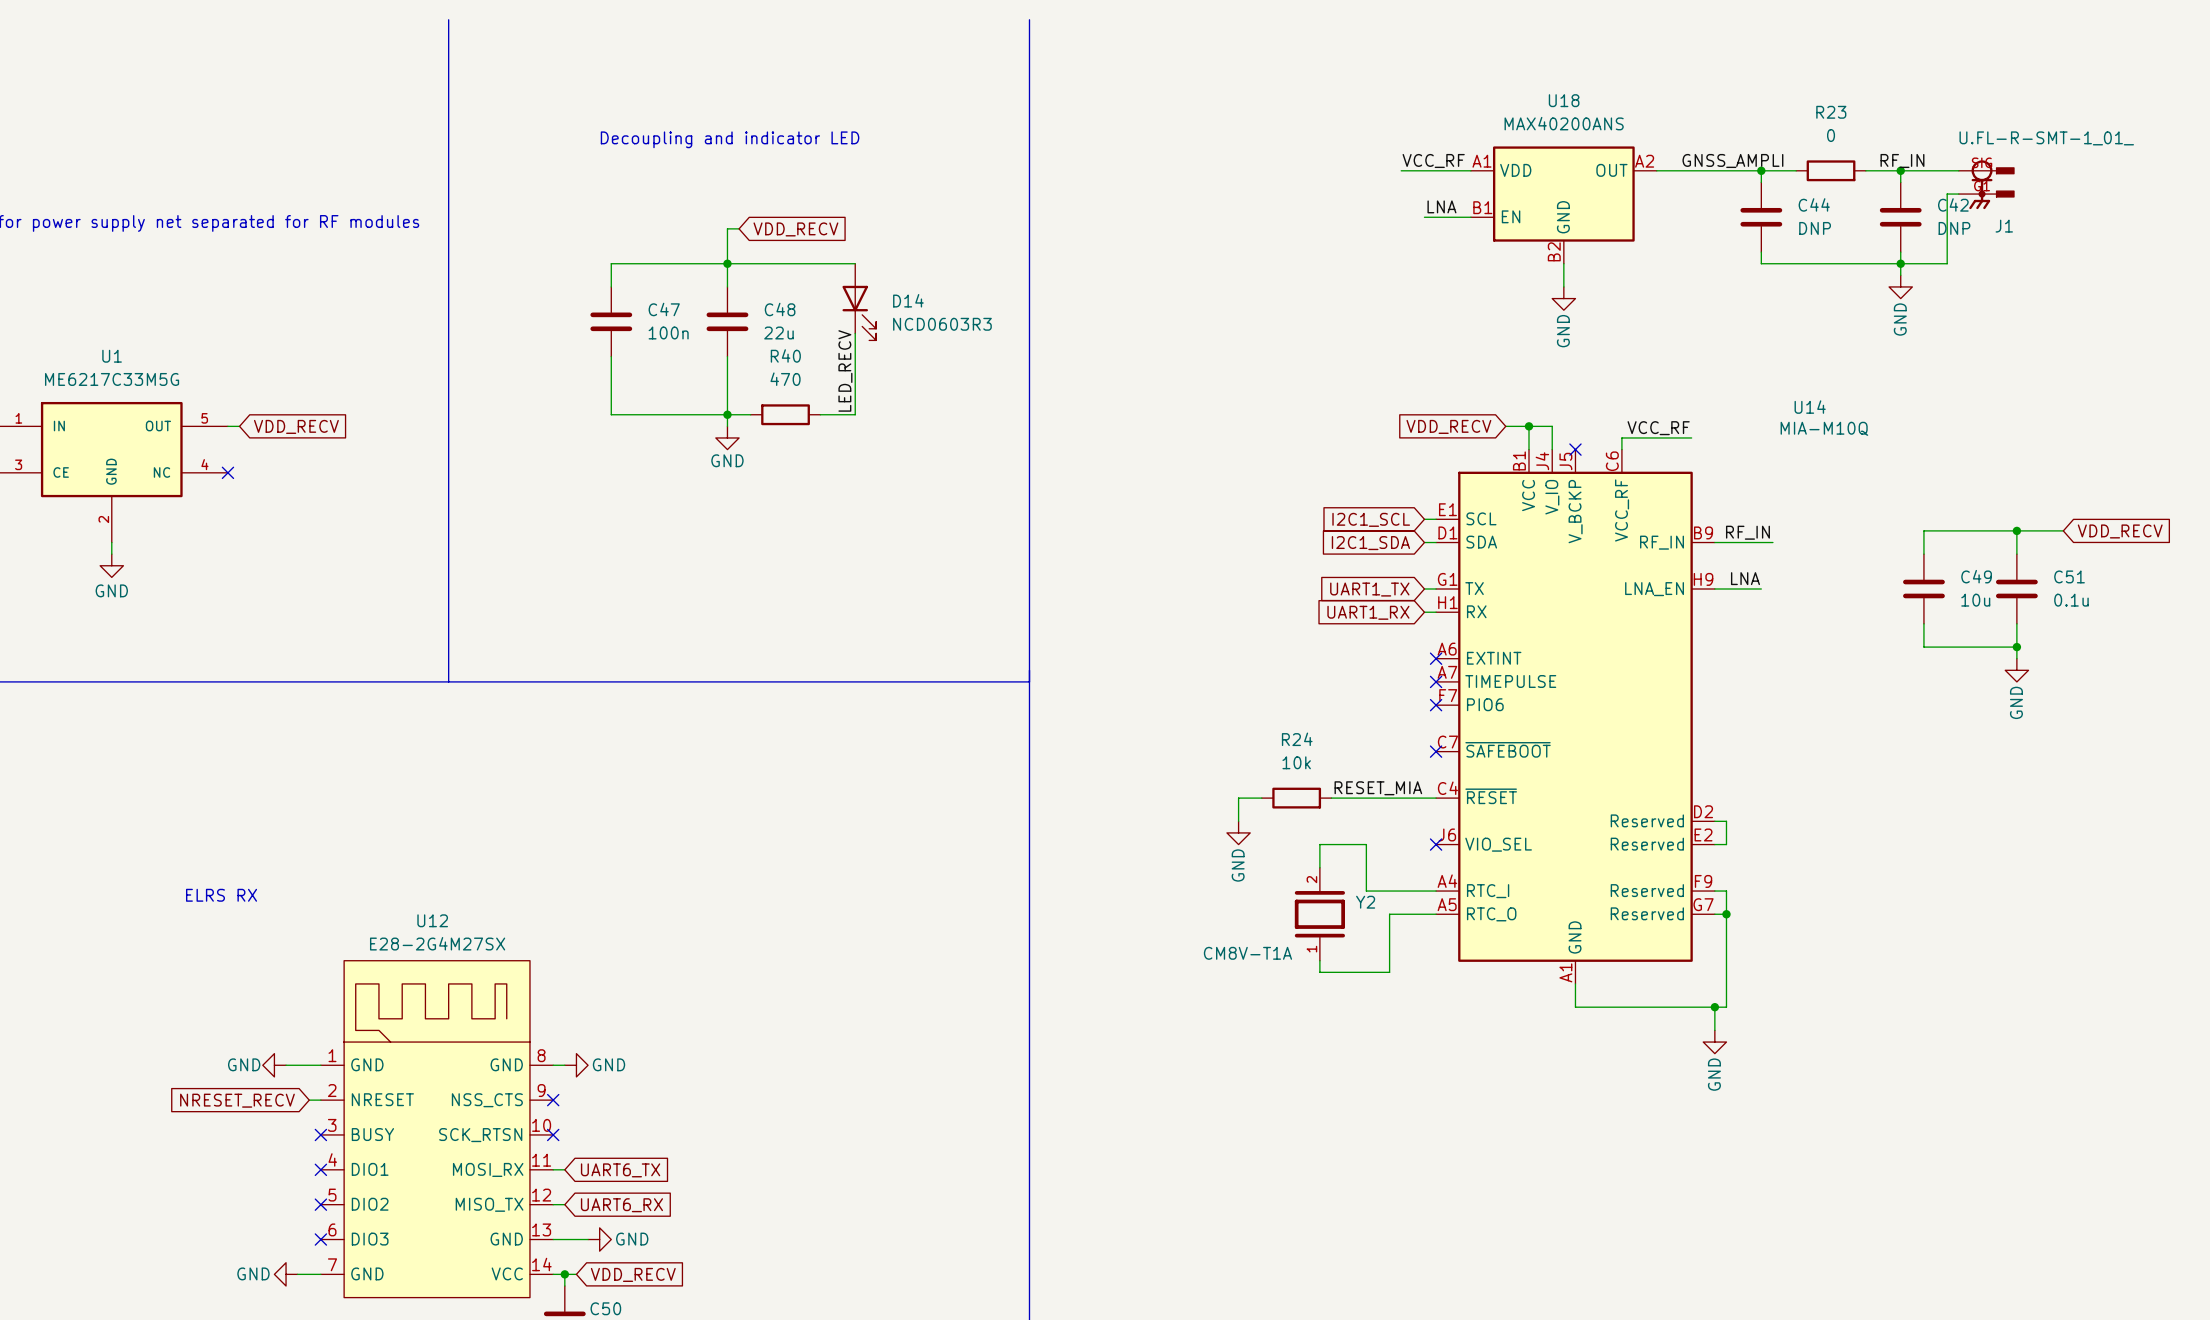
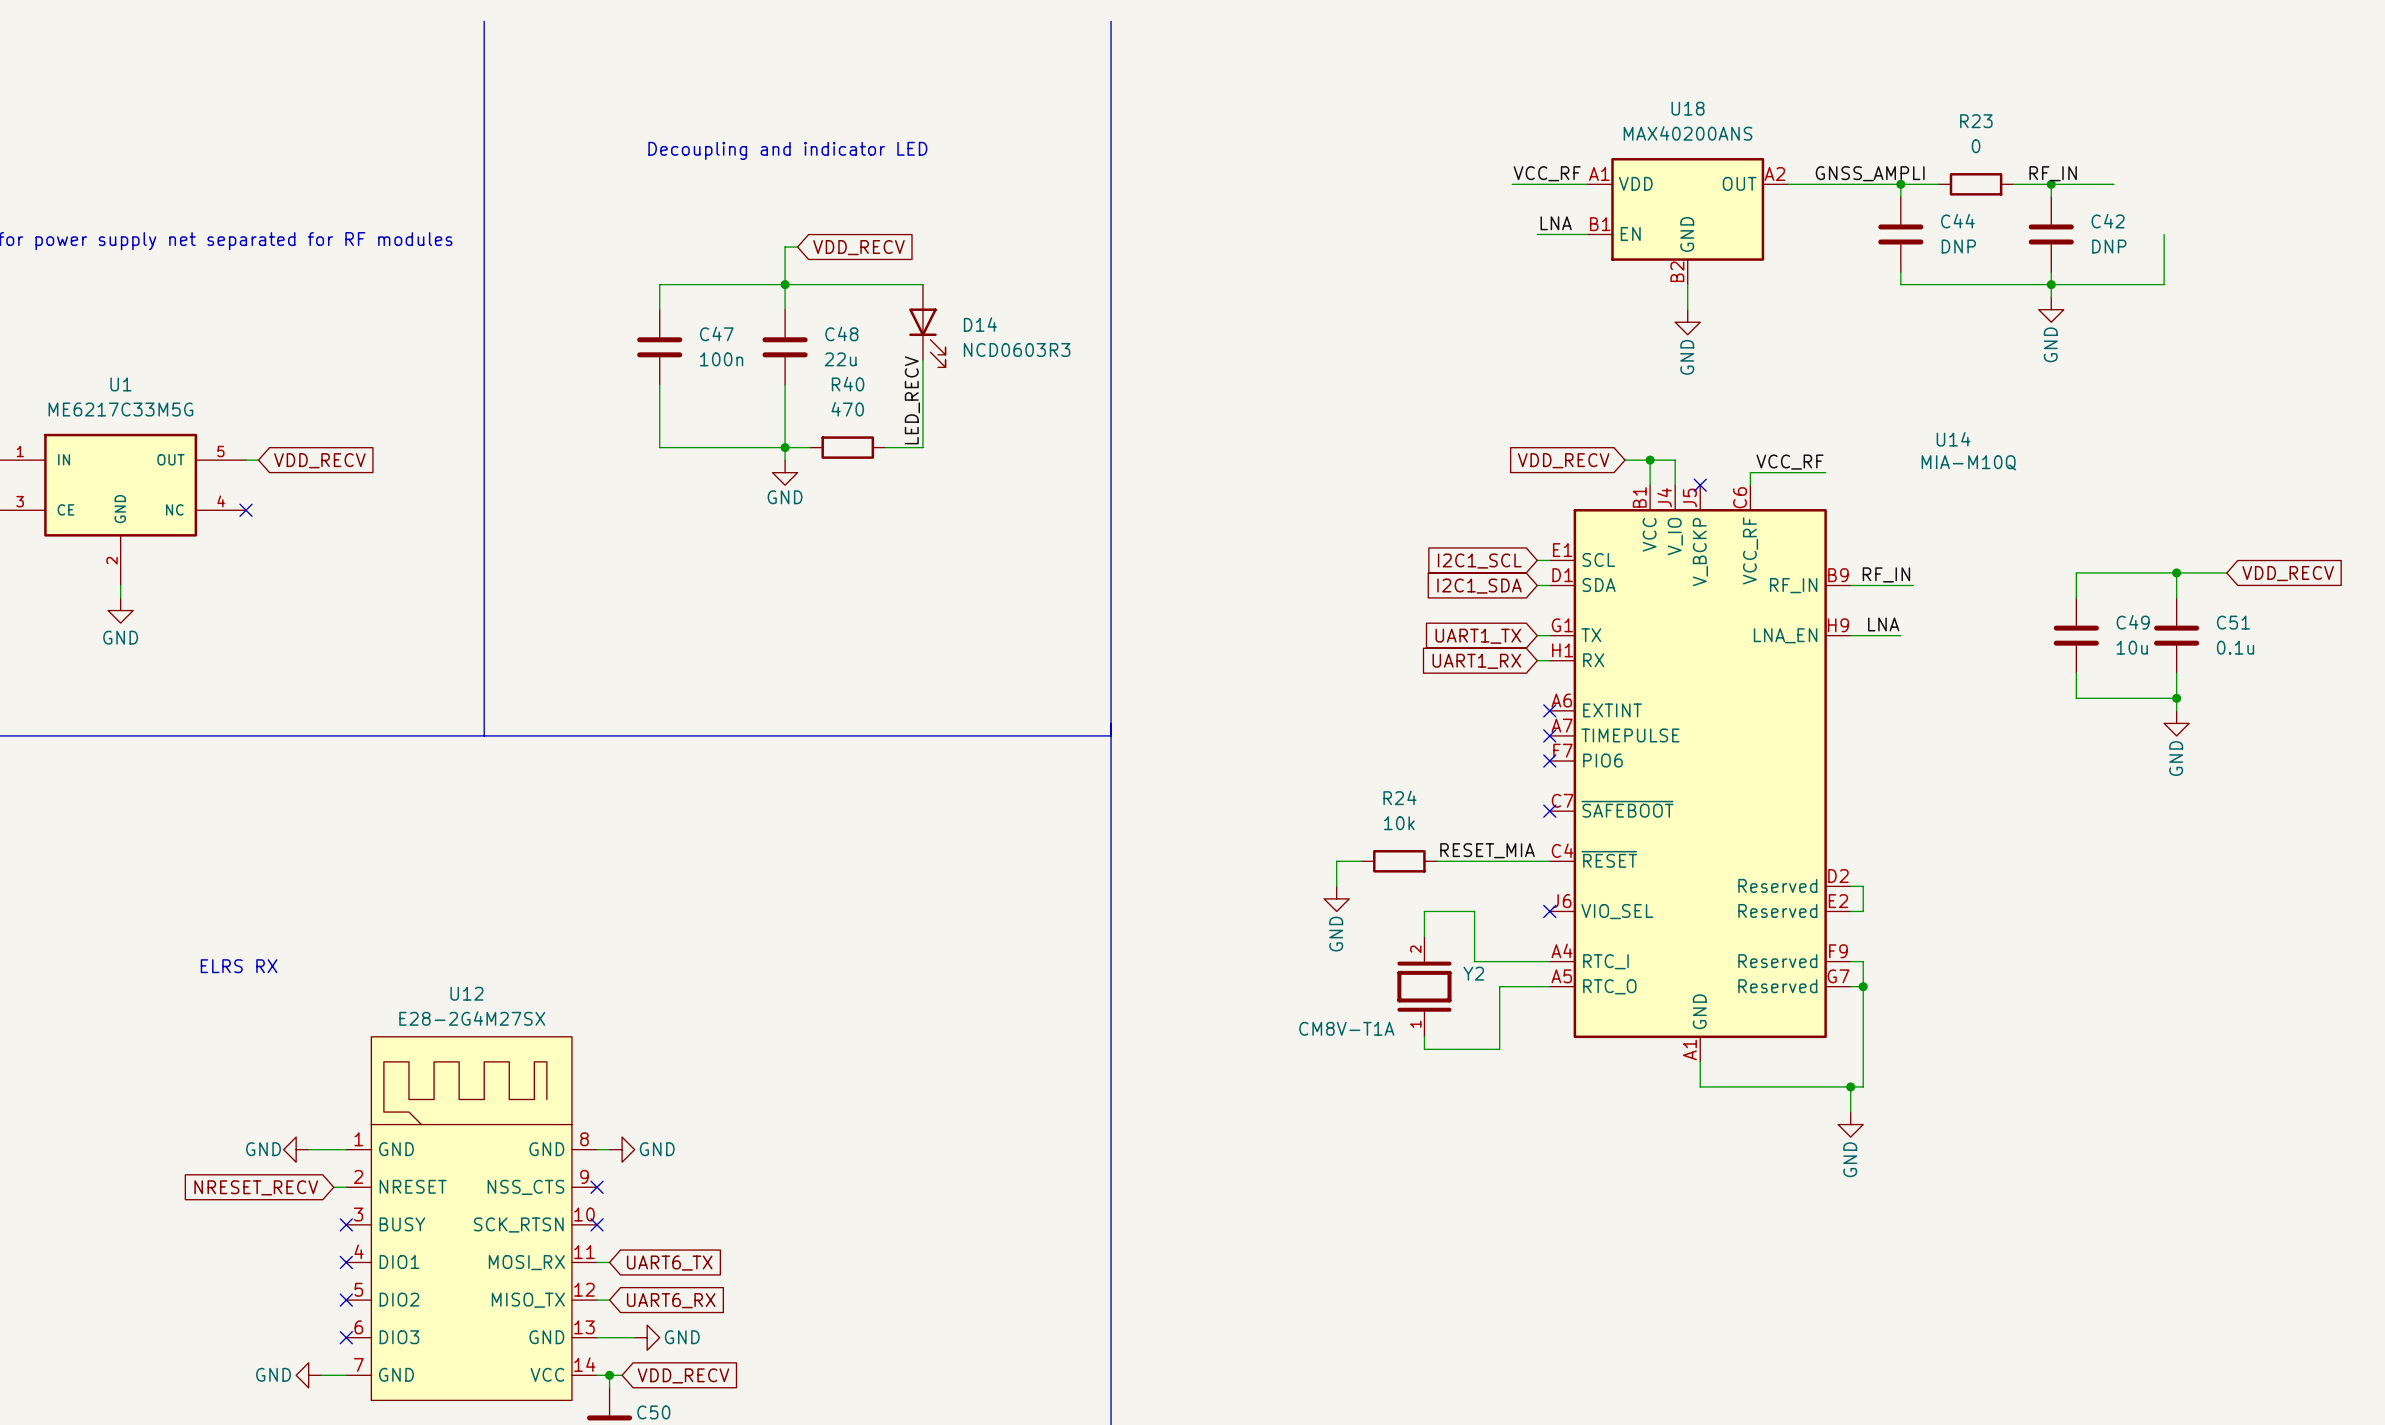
J1: U.FL-R-SMT-1_01_ (1986, 184) -> none
wire: (1958, 194) (1947, 194) (1947, 263) -> (2164, 234) (2164, 284) (2101, 284)

